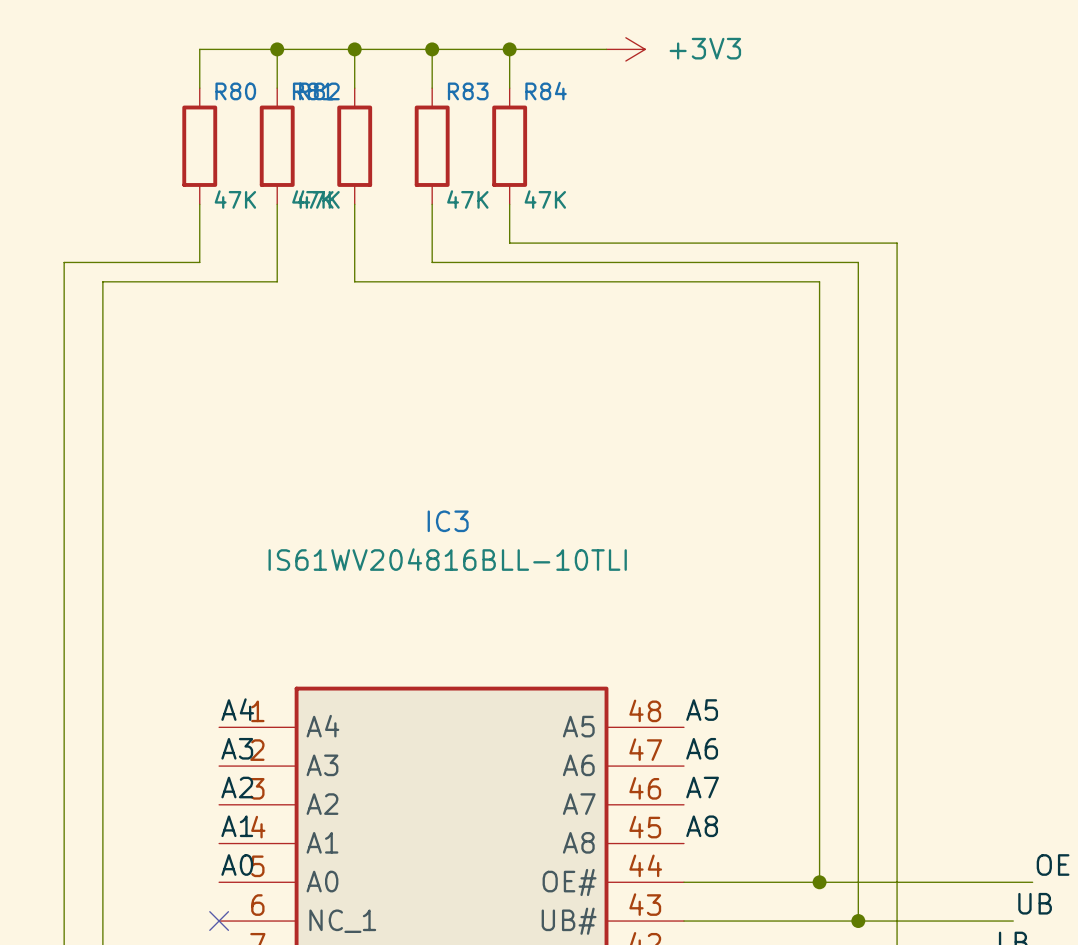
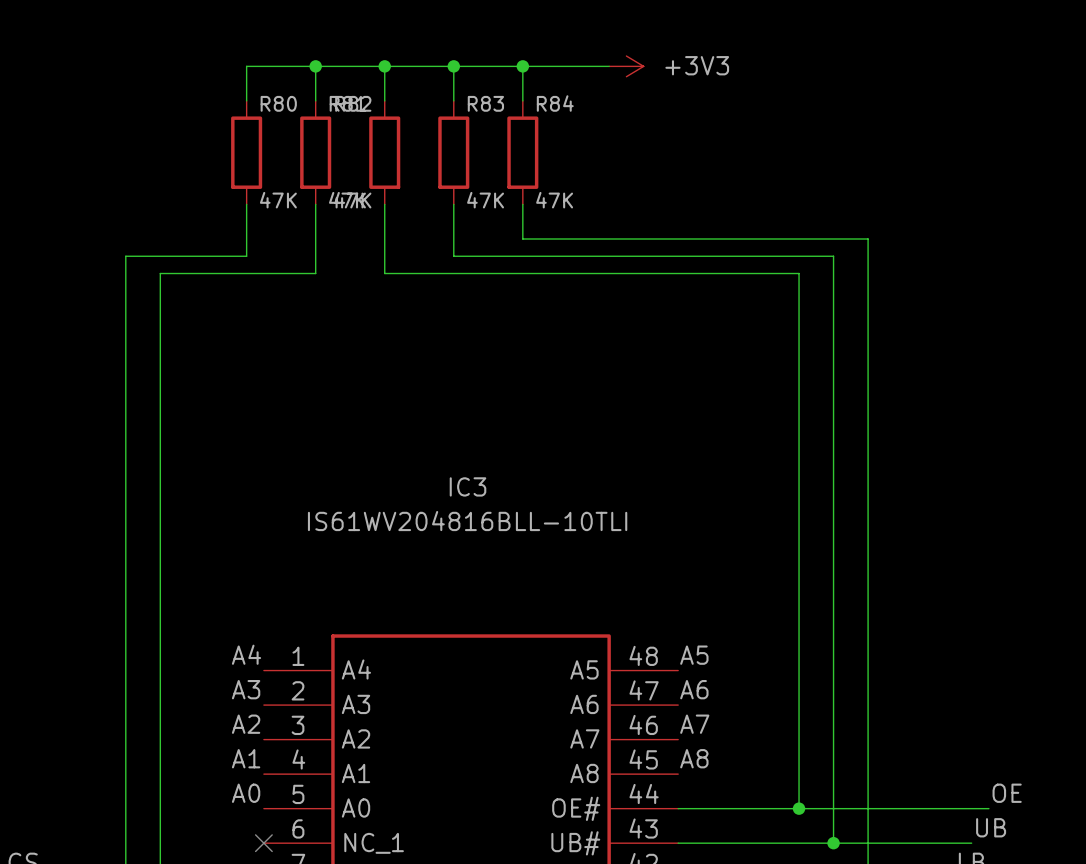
label position: A4 (237, 709) -> A4 (246, 654)
label position: A3 (237, 748) -> A3 (246, 689)
label position: A2 (237, 787) -> A2 (246, 724)
label position: A1 (237, 826) -> A1 (246, 758)
label position: A0 (237, 865) -> A0 (246, 793)

